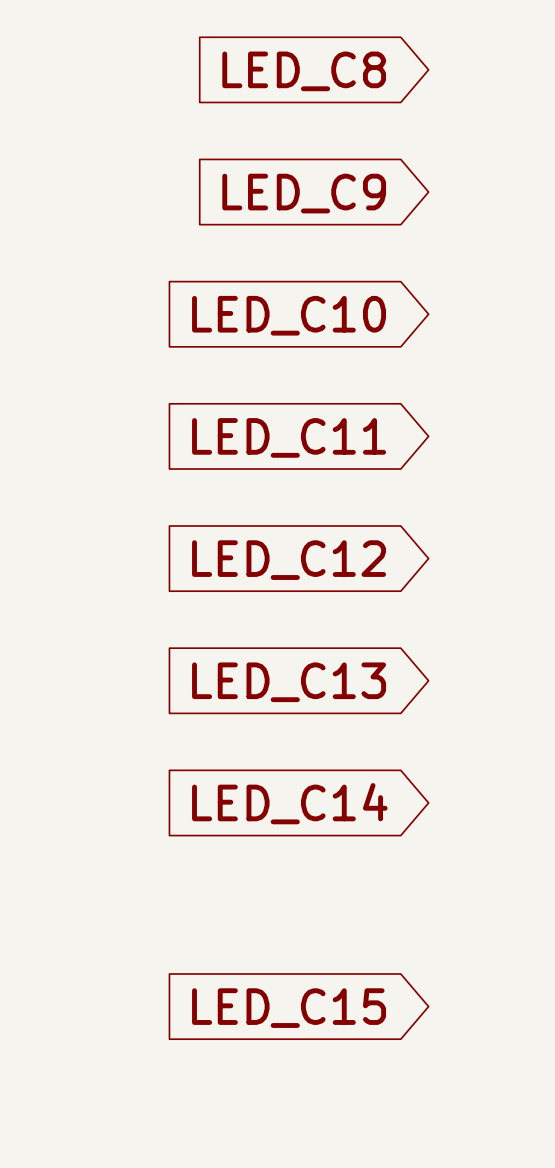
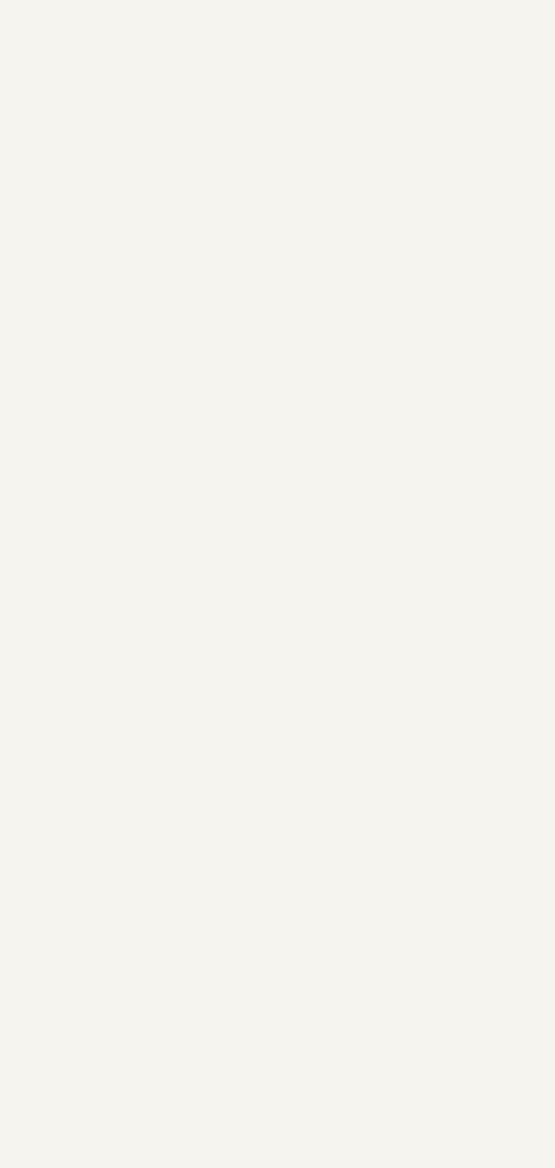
global label: LED_C8 (304, 71) -> none
global label: LED_C9 (304, 193) -> none
global label: LED_C10 (289, 315) -> none
global label: LED_C11 (289, 437) -> none
global label: LED_C12 (289, 560) -> none
global label: LED_C13 (289, 682) -> none
global label: LED_C14 (289, 803) -> none
global label: LED_C15 (289, 1008) -> none

